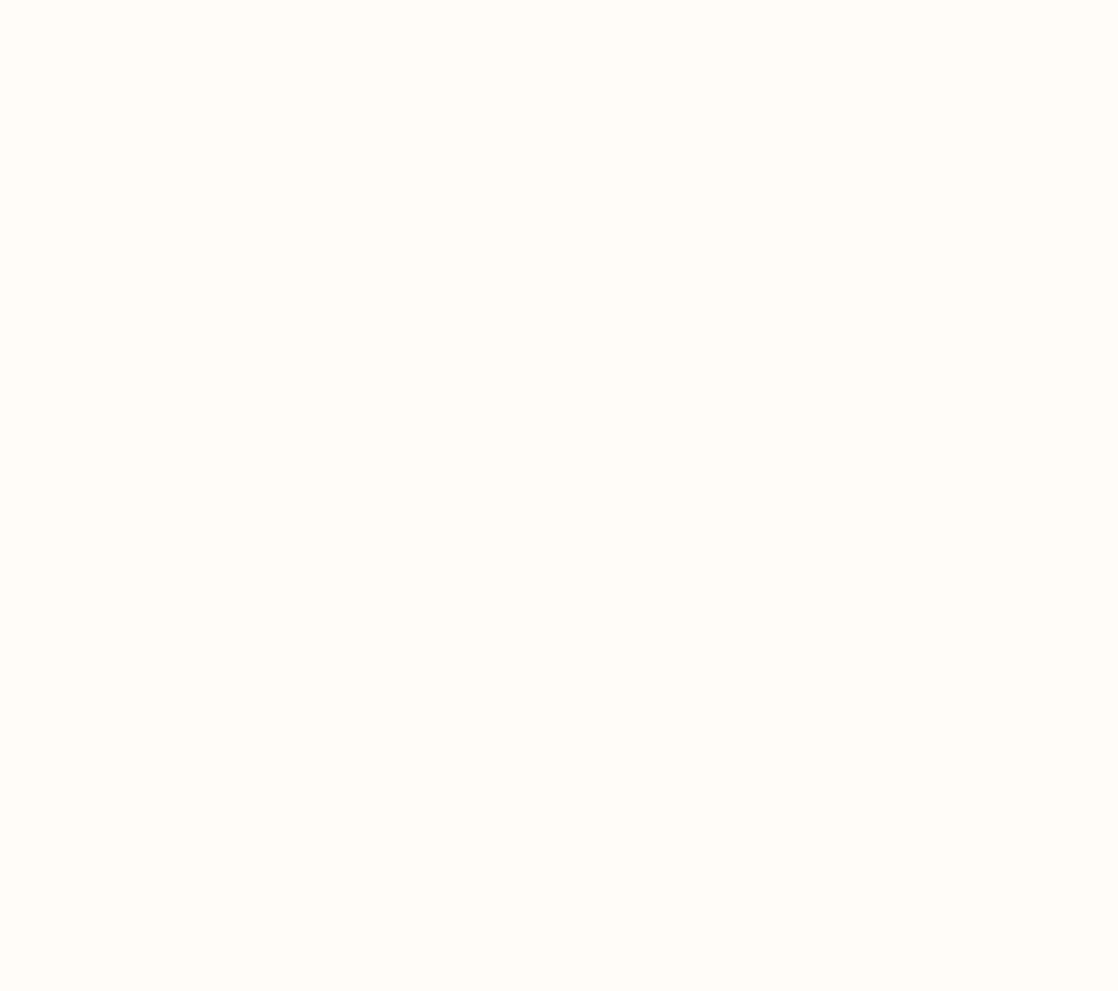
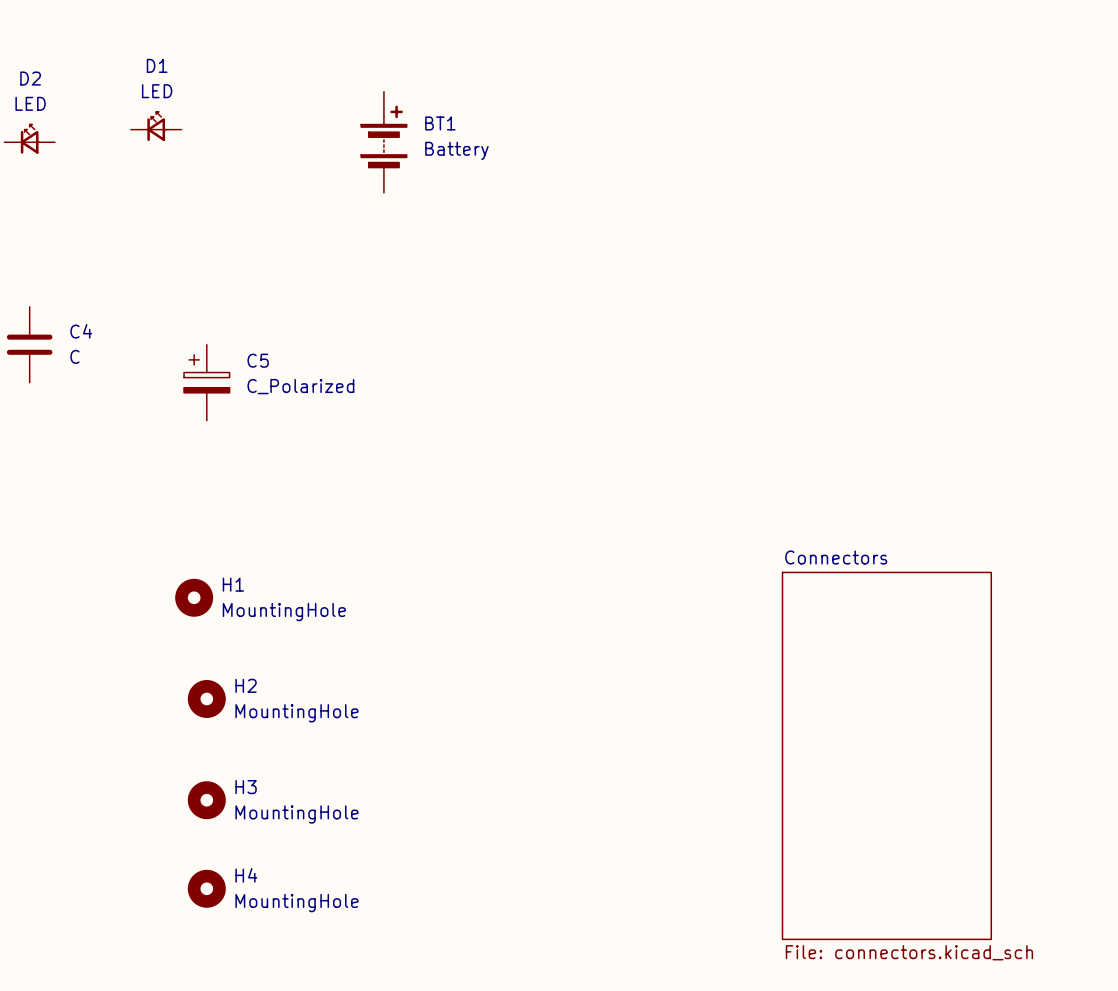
D1: none -> LED (156, 126)
D2: none -> LED (29, 139)
BT1: none -> Battery (383, 142)
C4: none -> C (29, 344)
C5: none -> C_Polarized (206, 382)
H1: none -> MountingHole (194, 597)
H2: none -> MountingHole (206, 698)
sheet Connectors: none -> File: connectors.kicad_sch (886, 755)
H3: none -> MountingHole (206, 800)
H4: none -> MountingHole (206, 888)

